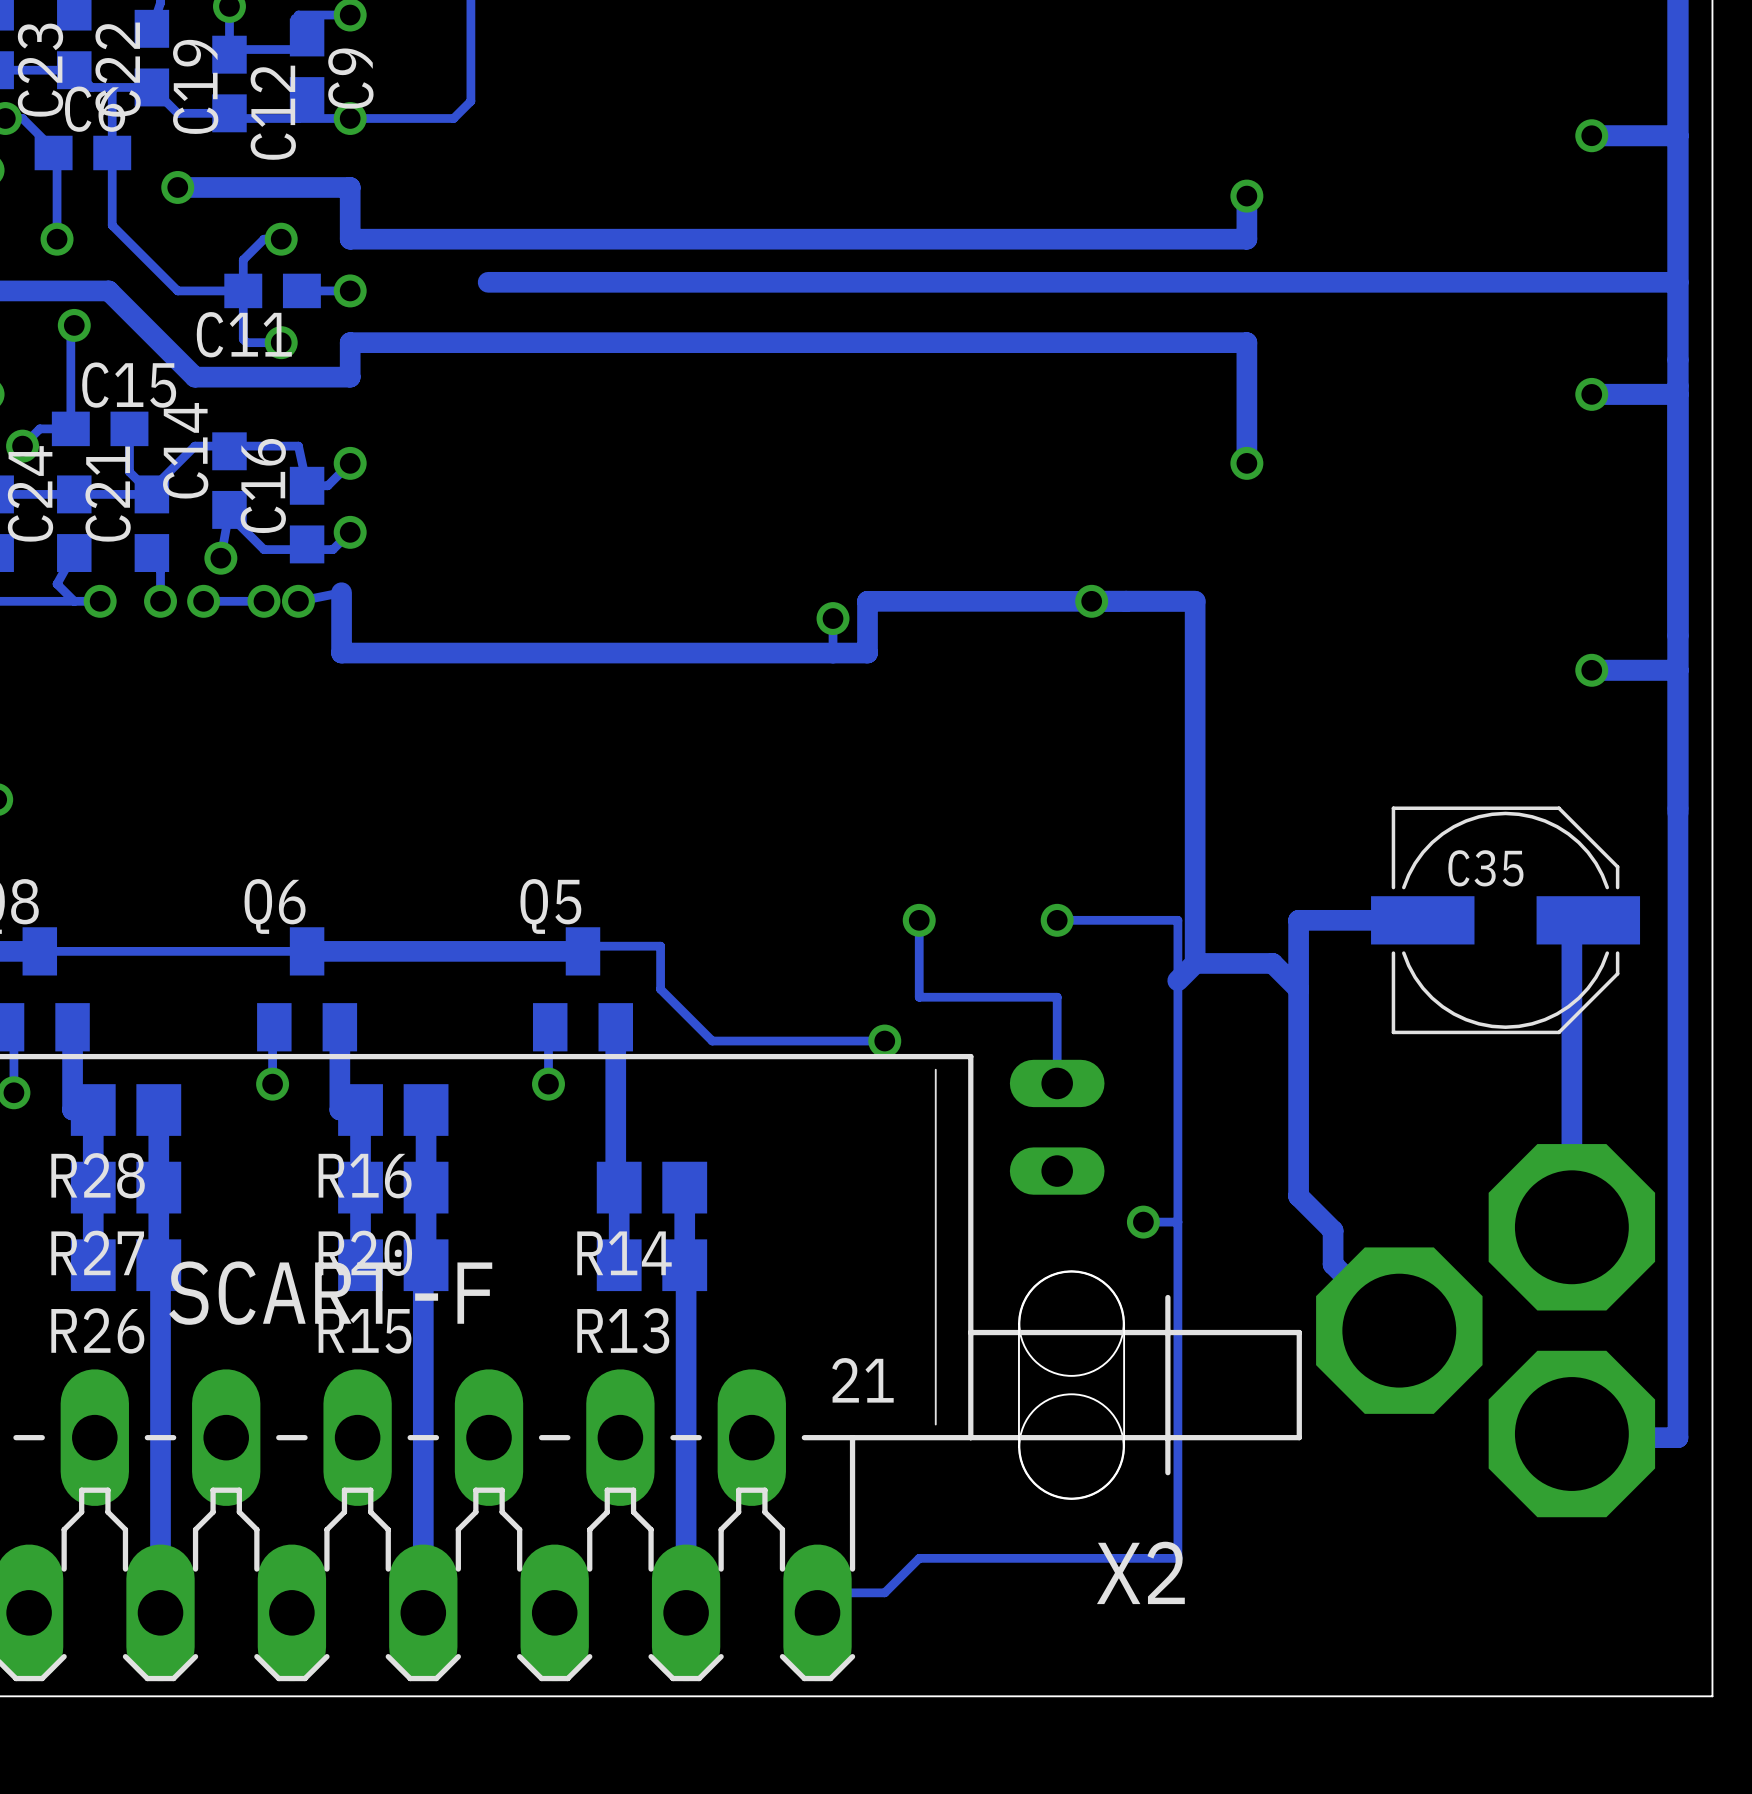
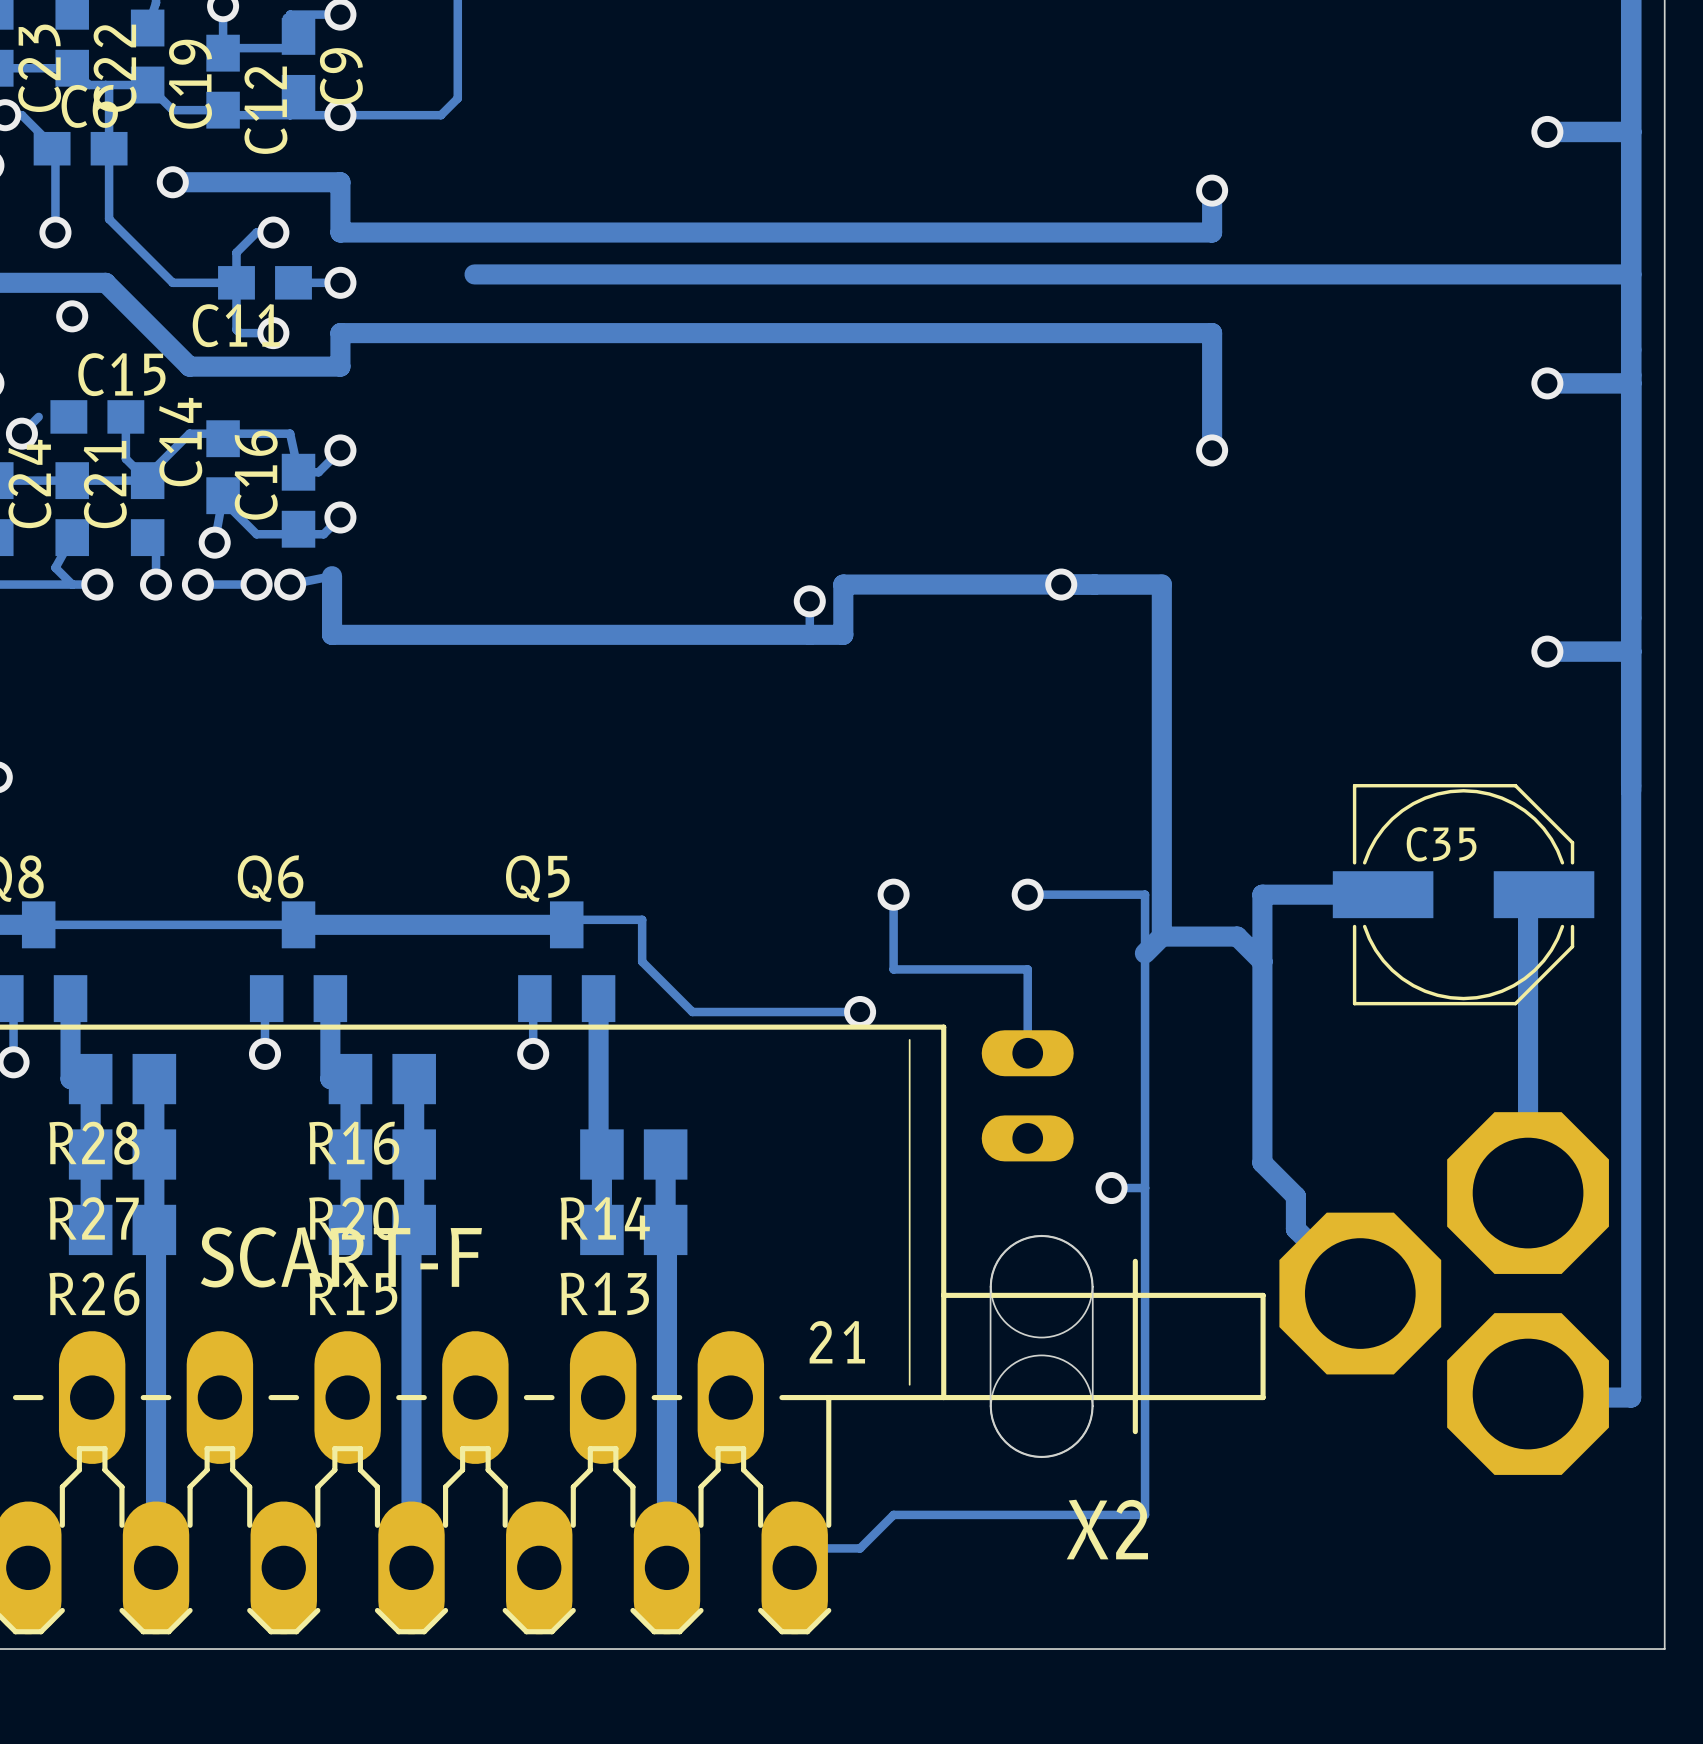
track: (70, 328) (70, 428) (39, 428) -> none

